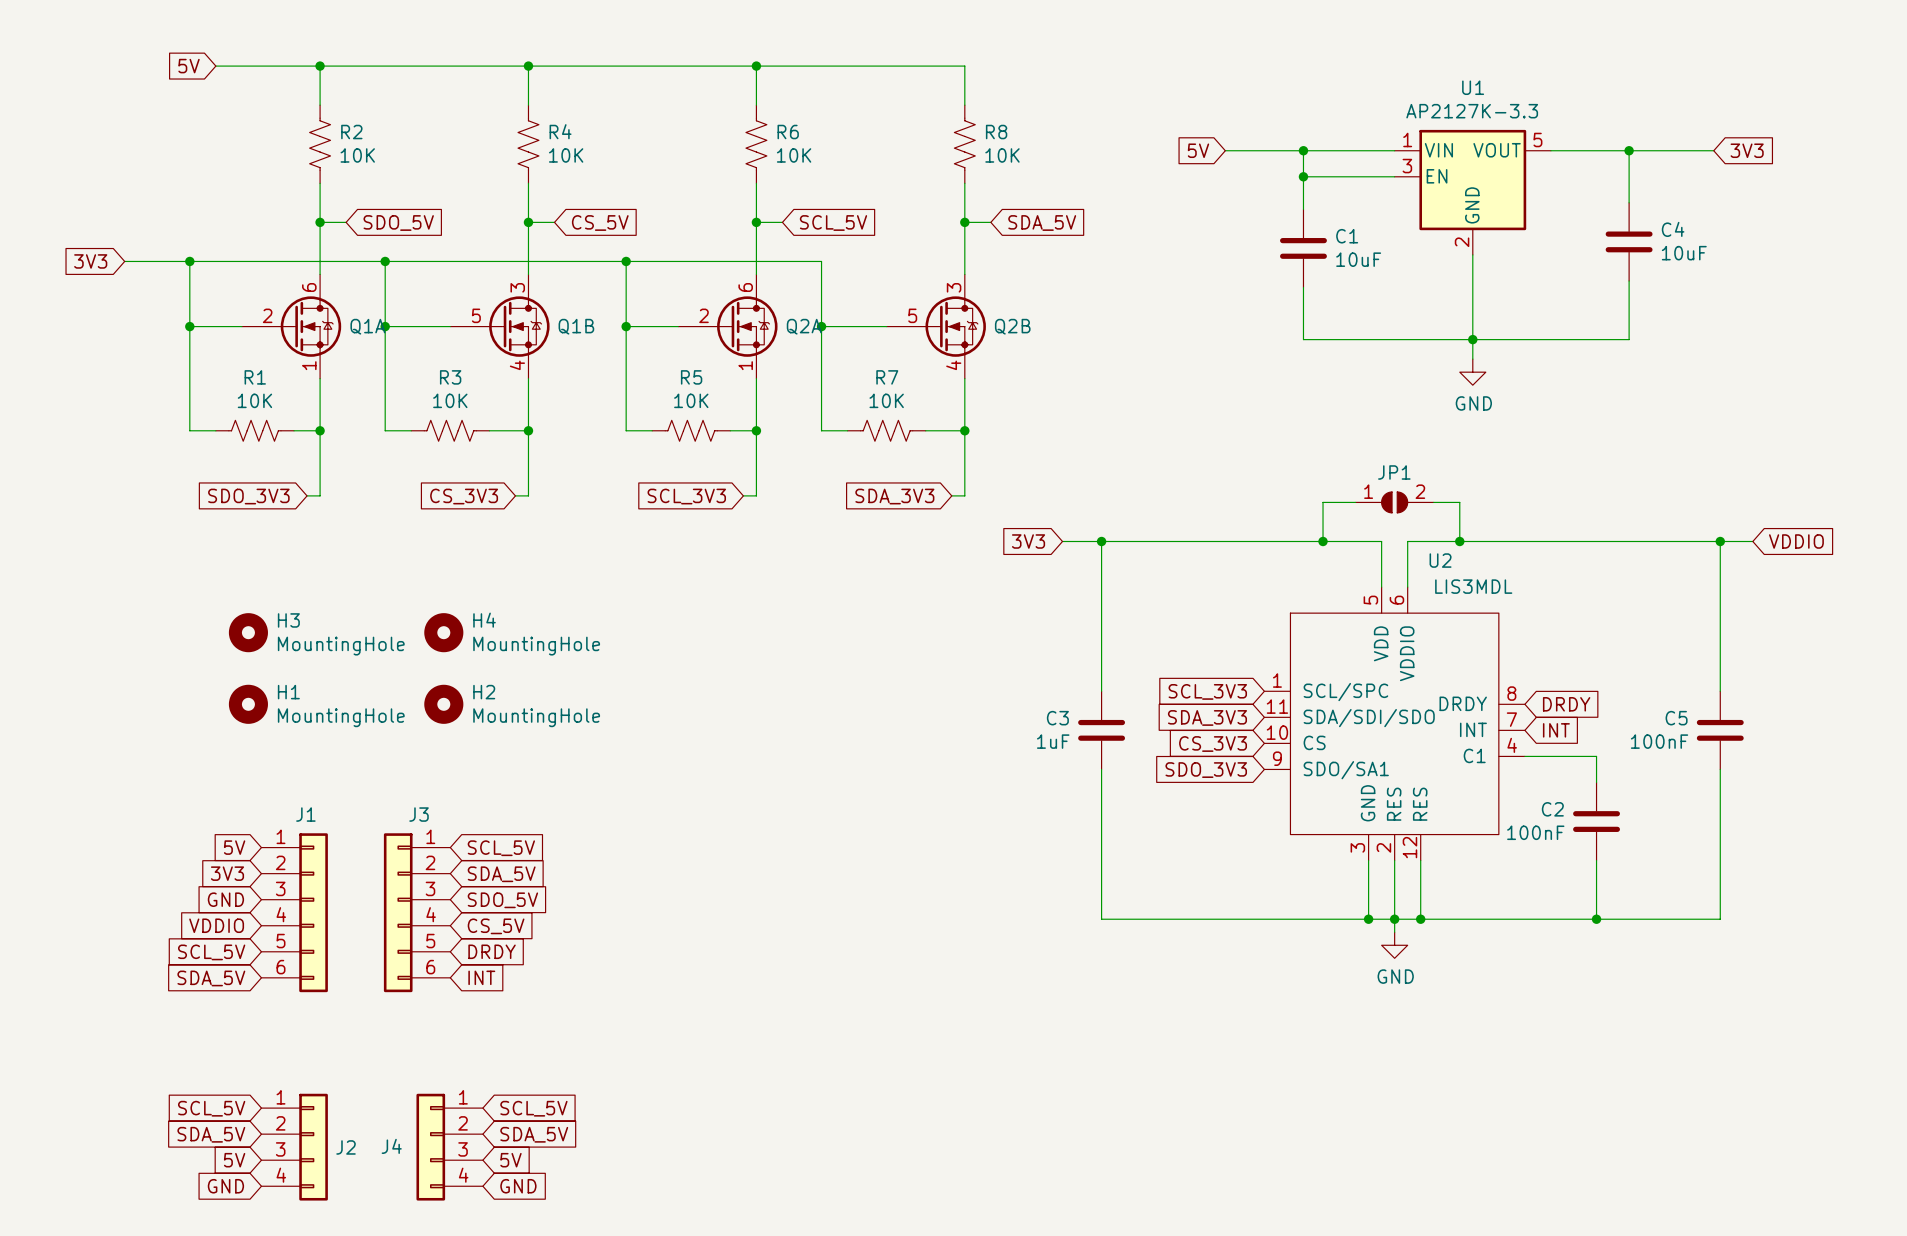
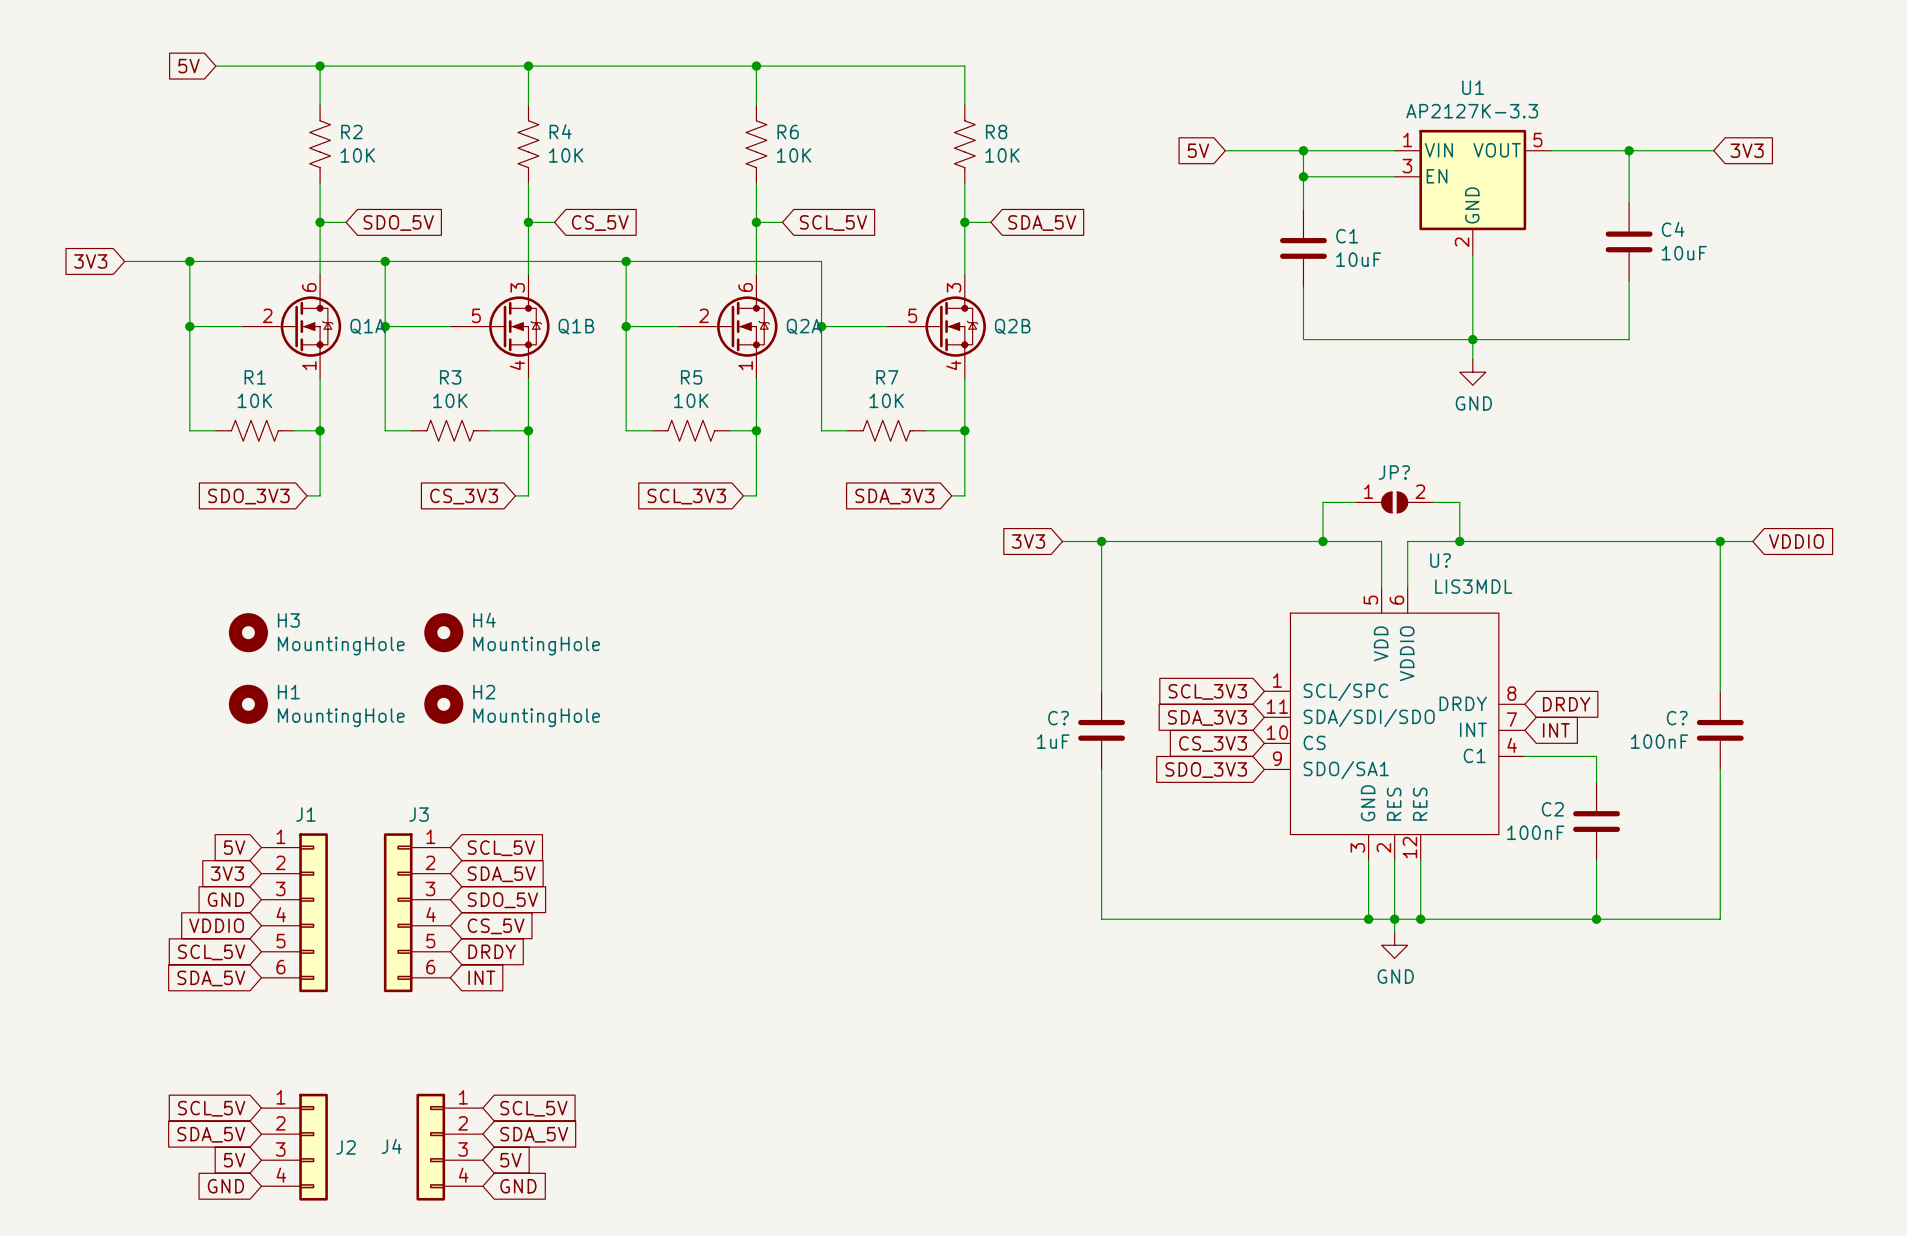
JP1 name: JP1 (1394, 472) -> JP? (1394, 472)
U2 name: U2 (1440, 560) -> U? (1440, 560)
C3 name: C3 (1057, 718) -> C? (1058, 718)
C5 name: C5 (1676, 718) -> C? (1677, 718)

